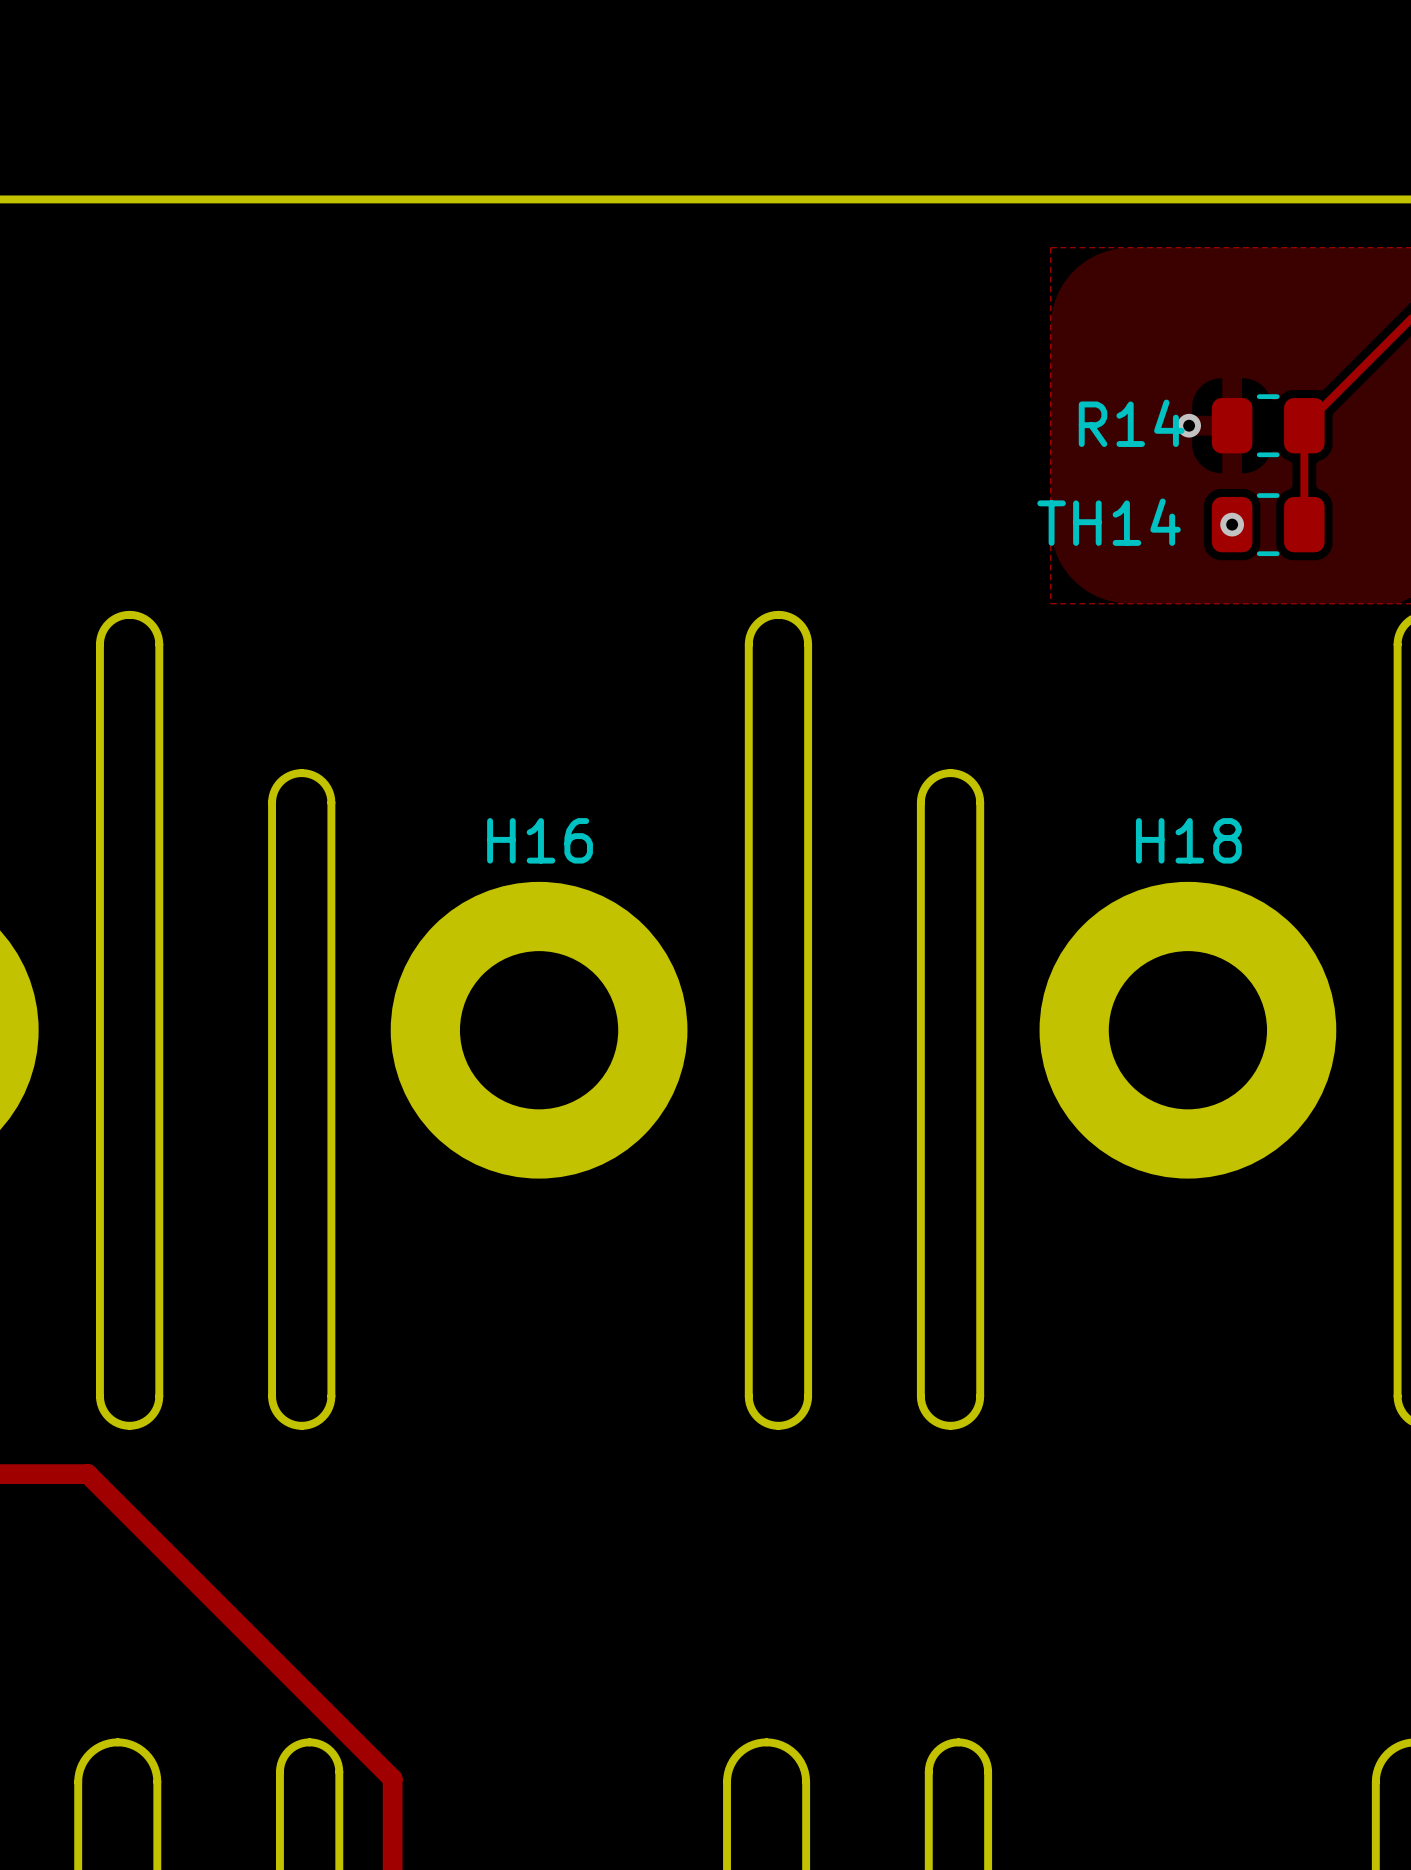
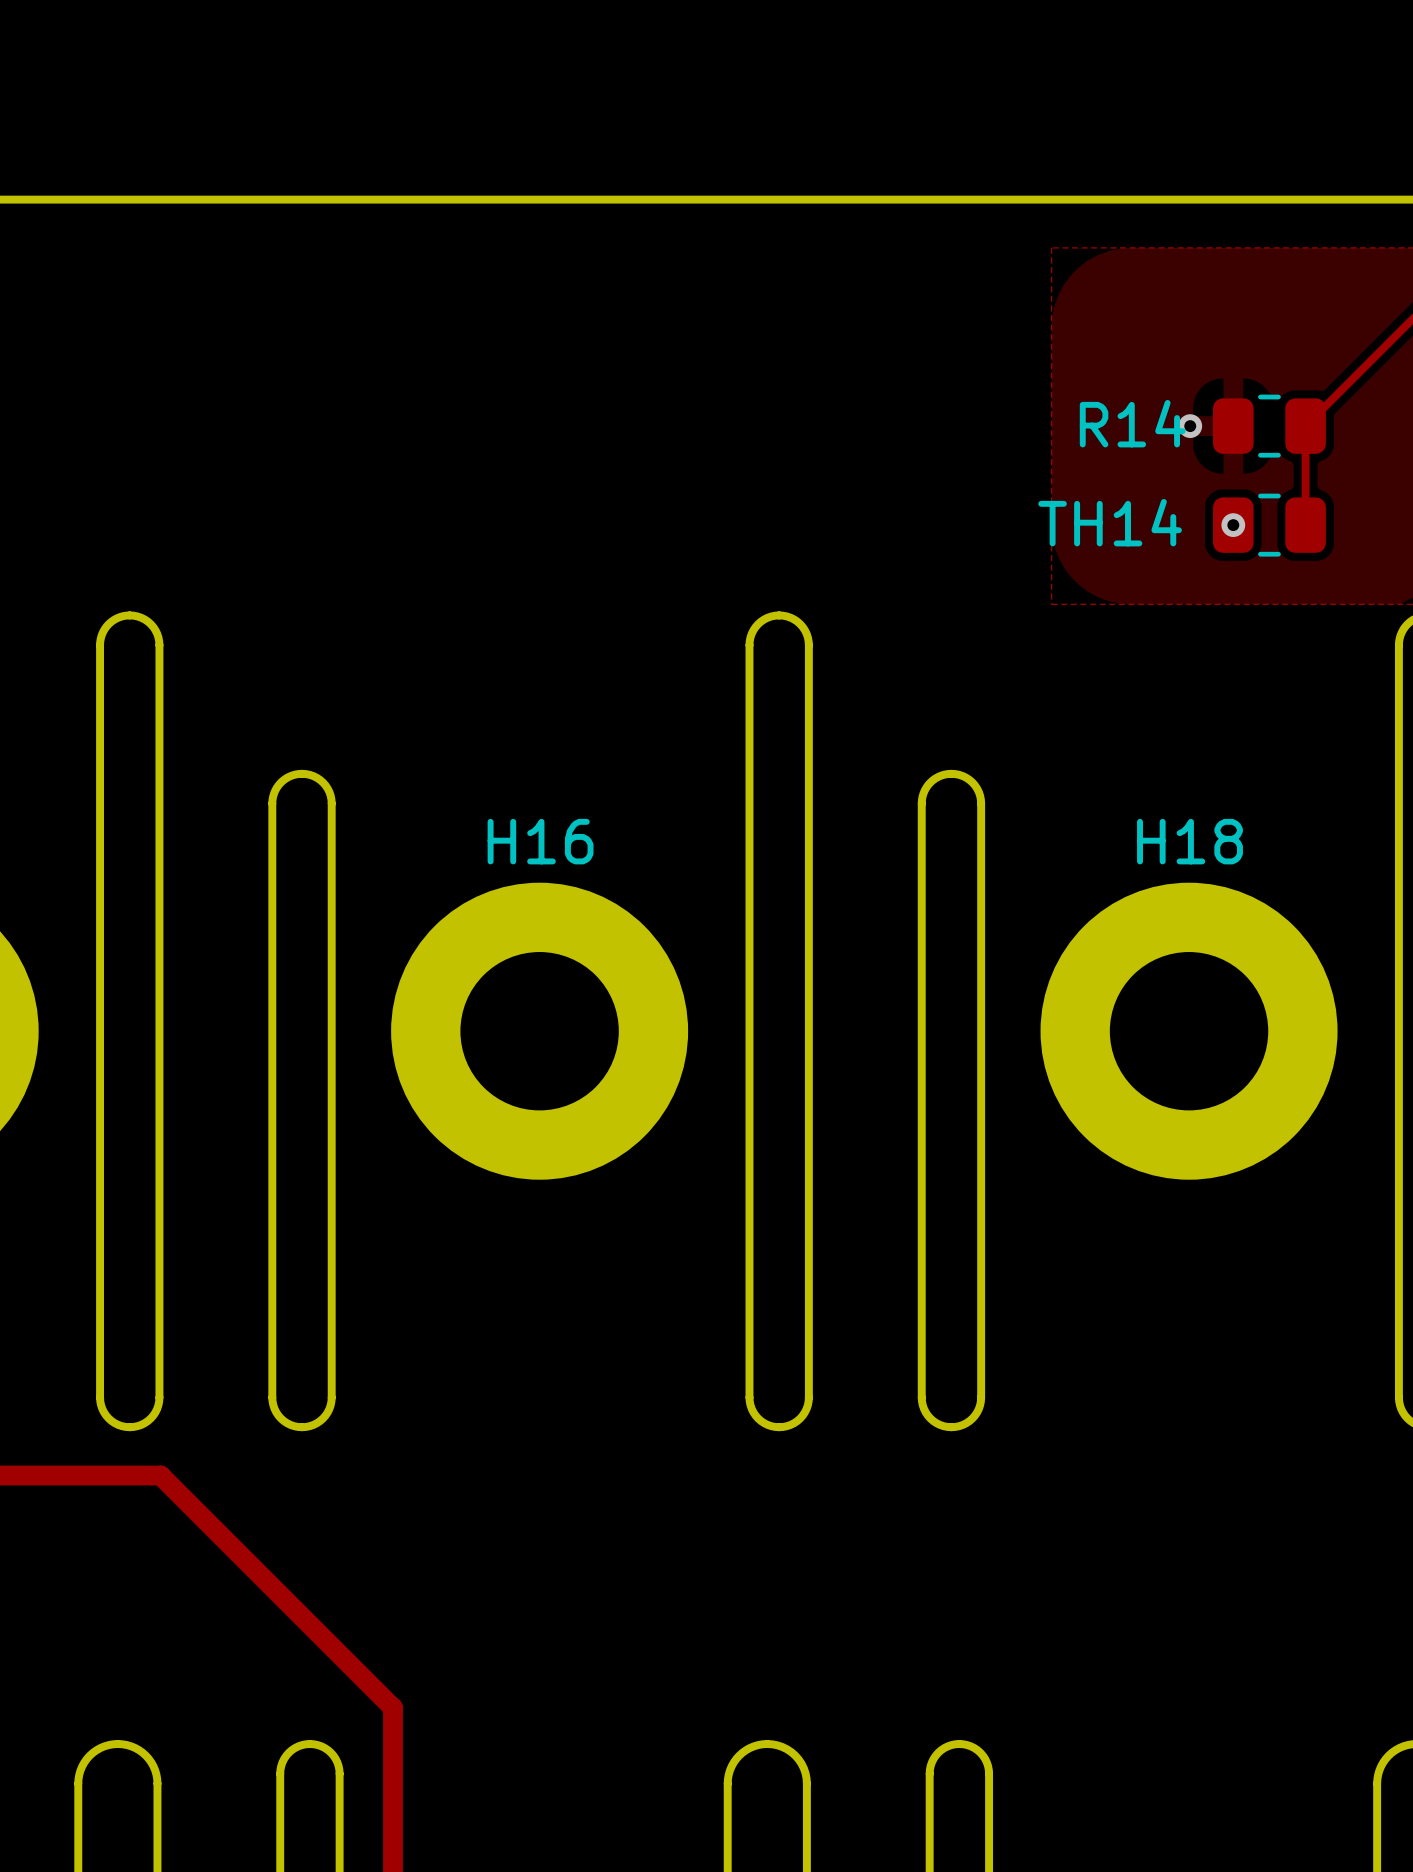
track: (87, 1474) (392, 1778) -> (87, 1475) (160, 1475) (393, 1707) (393, 1780)

